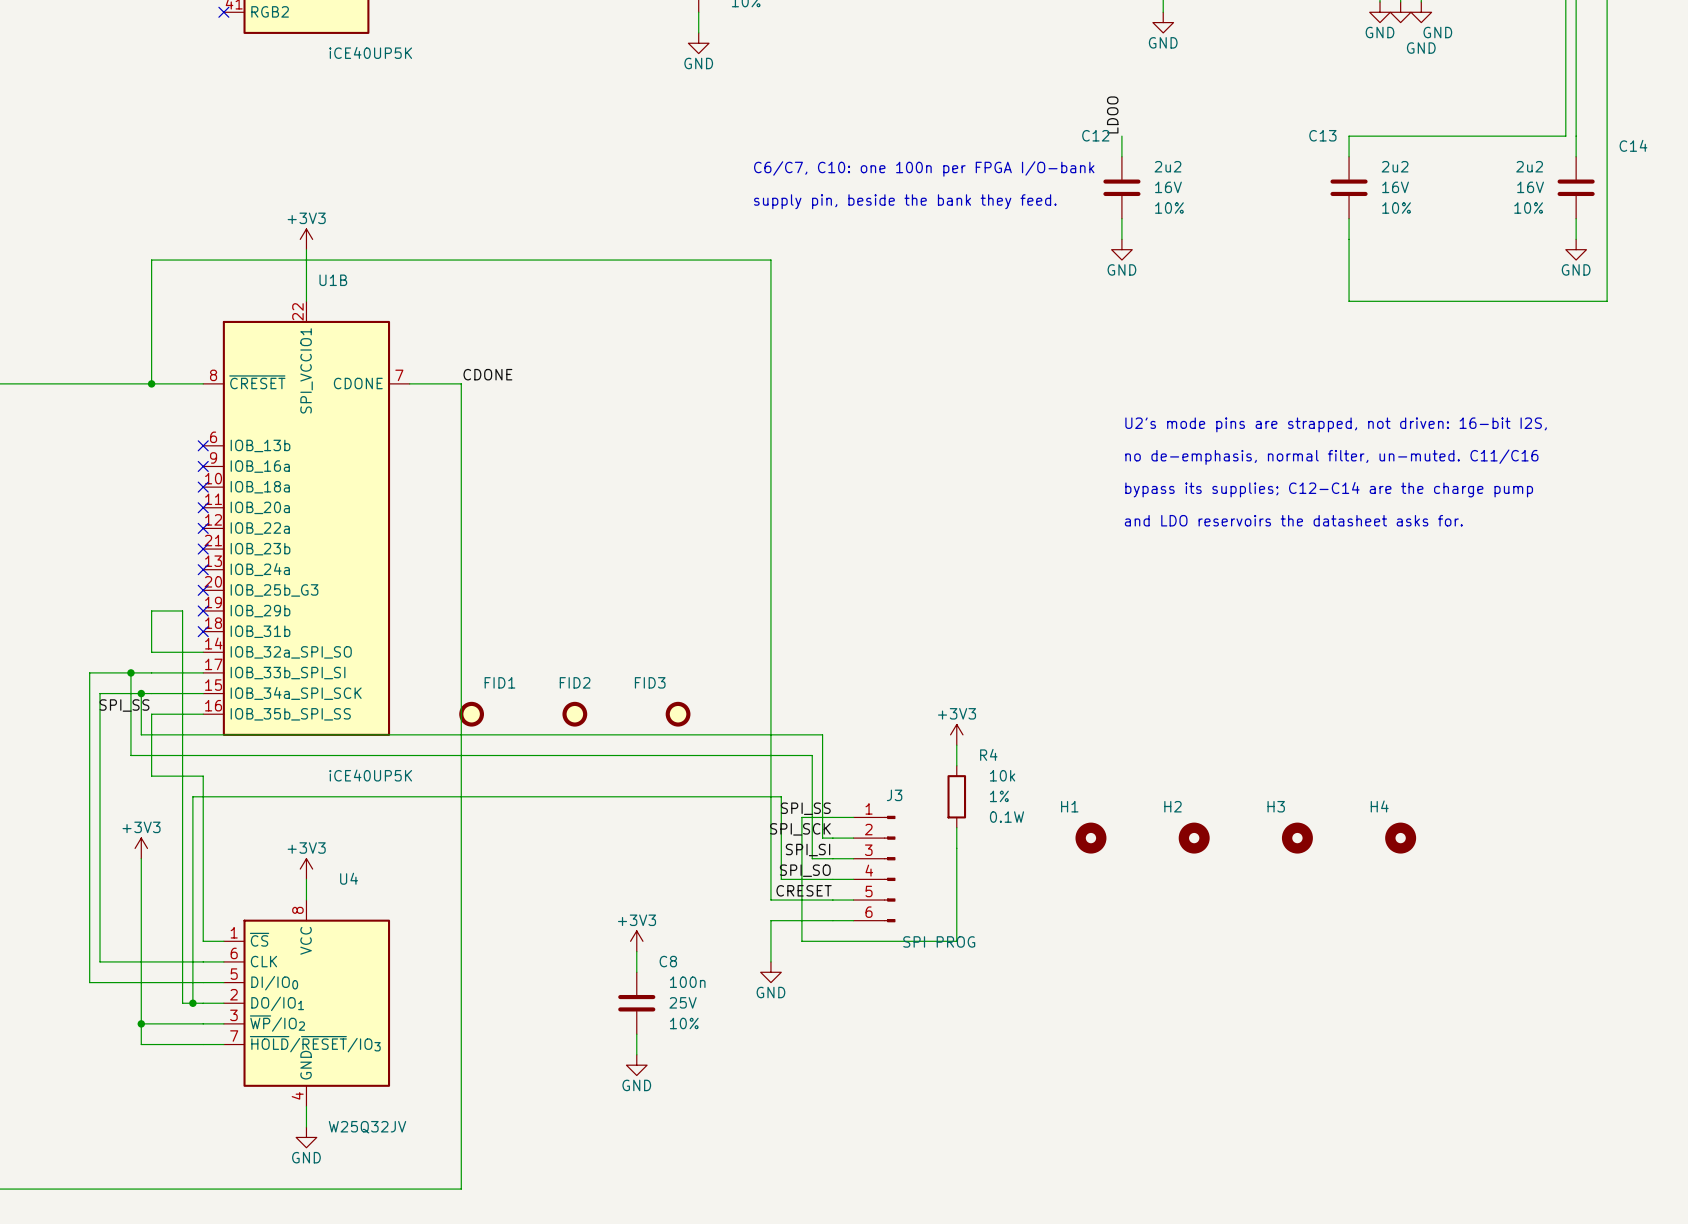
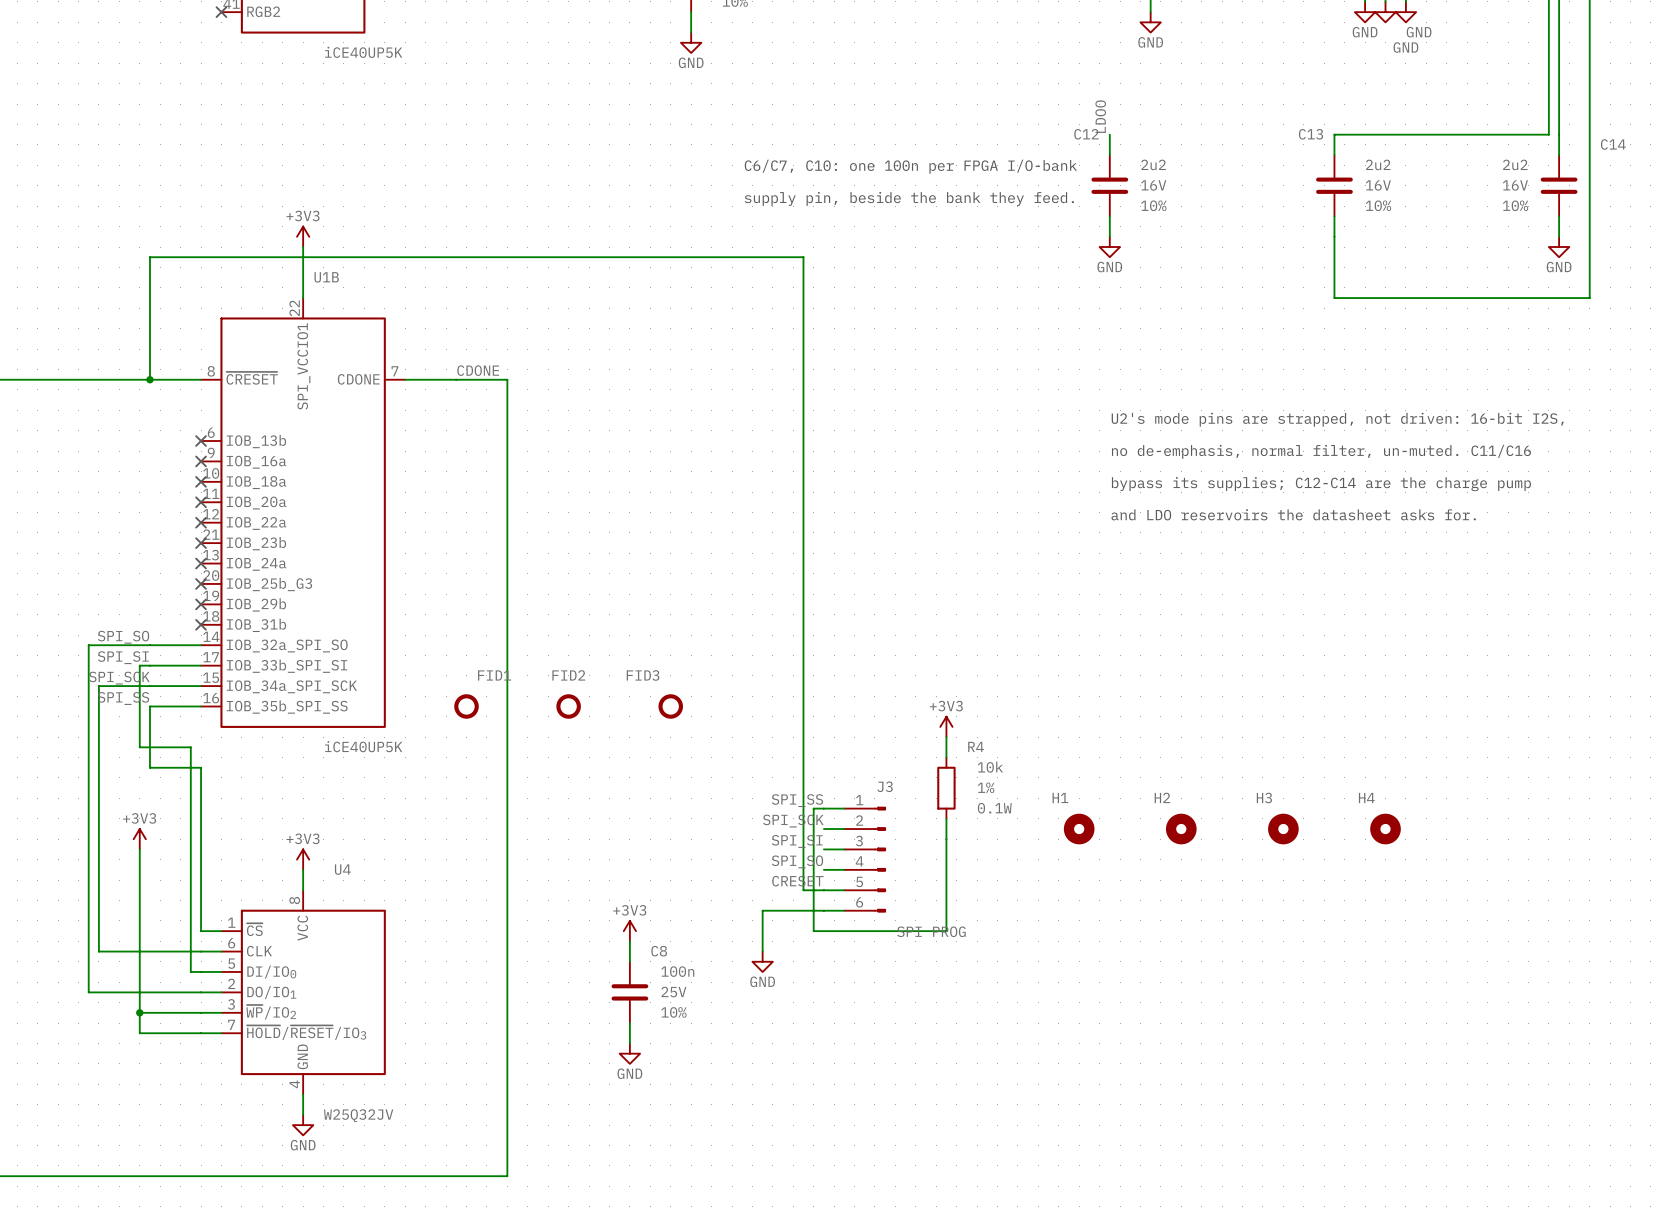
wire: (770, 260) (770, 900) (812, 900) -> (762, 257) (803, 257) (803, 747)
wire: (461, 383) (461, 1189) -> (456, 379) (507, 379) (507, 1176) (456, 1176)
label: none -> SPI_SO (123, 637)
wire: (151, 652) (151, 610) (182, 610) (182, 1003) -> none
label: none -> SPI_SI (123, 657)
wire: (89, 672) (141, 672) -> (88, 665) (88, 645) (149, 645)
wire: (130, 672) (130, 755) (141, 755) -> (139, 726) (139, 747)
junction: (130, 672) -> none
wire: none -> (139, 665) (139, 686)
label: none -> SPI_SCK (119, 678)
junction: (141, 693) -> none
wire: (141, 734) (822, 734) (822, 817) (801, 817) (801, 941) (822, 941) -> none
wire: (192, 755) (812, 755) -> (190, 747) (190, 788)
U1B value position: iCE40UP5K (370, 775) -> iCE40UP5K (363, 746)
wire: (192, 796) (781, 796) (781, 879) (832, 879) -> none
wire: (822, 838) (832, 838) -> (813, 829) (813, 931)
wire: (812, 858) (832, 858) -> (803, 849) (803, 890)
wire: (89, 982) (192, 982) (192, 1003) -> (88, 971) (88, 992) (180, 992)
junction: (192, 1003) -> none

